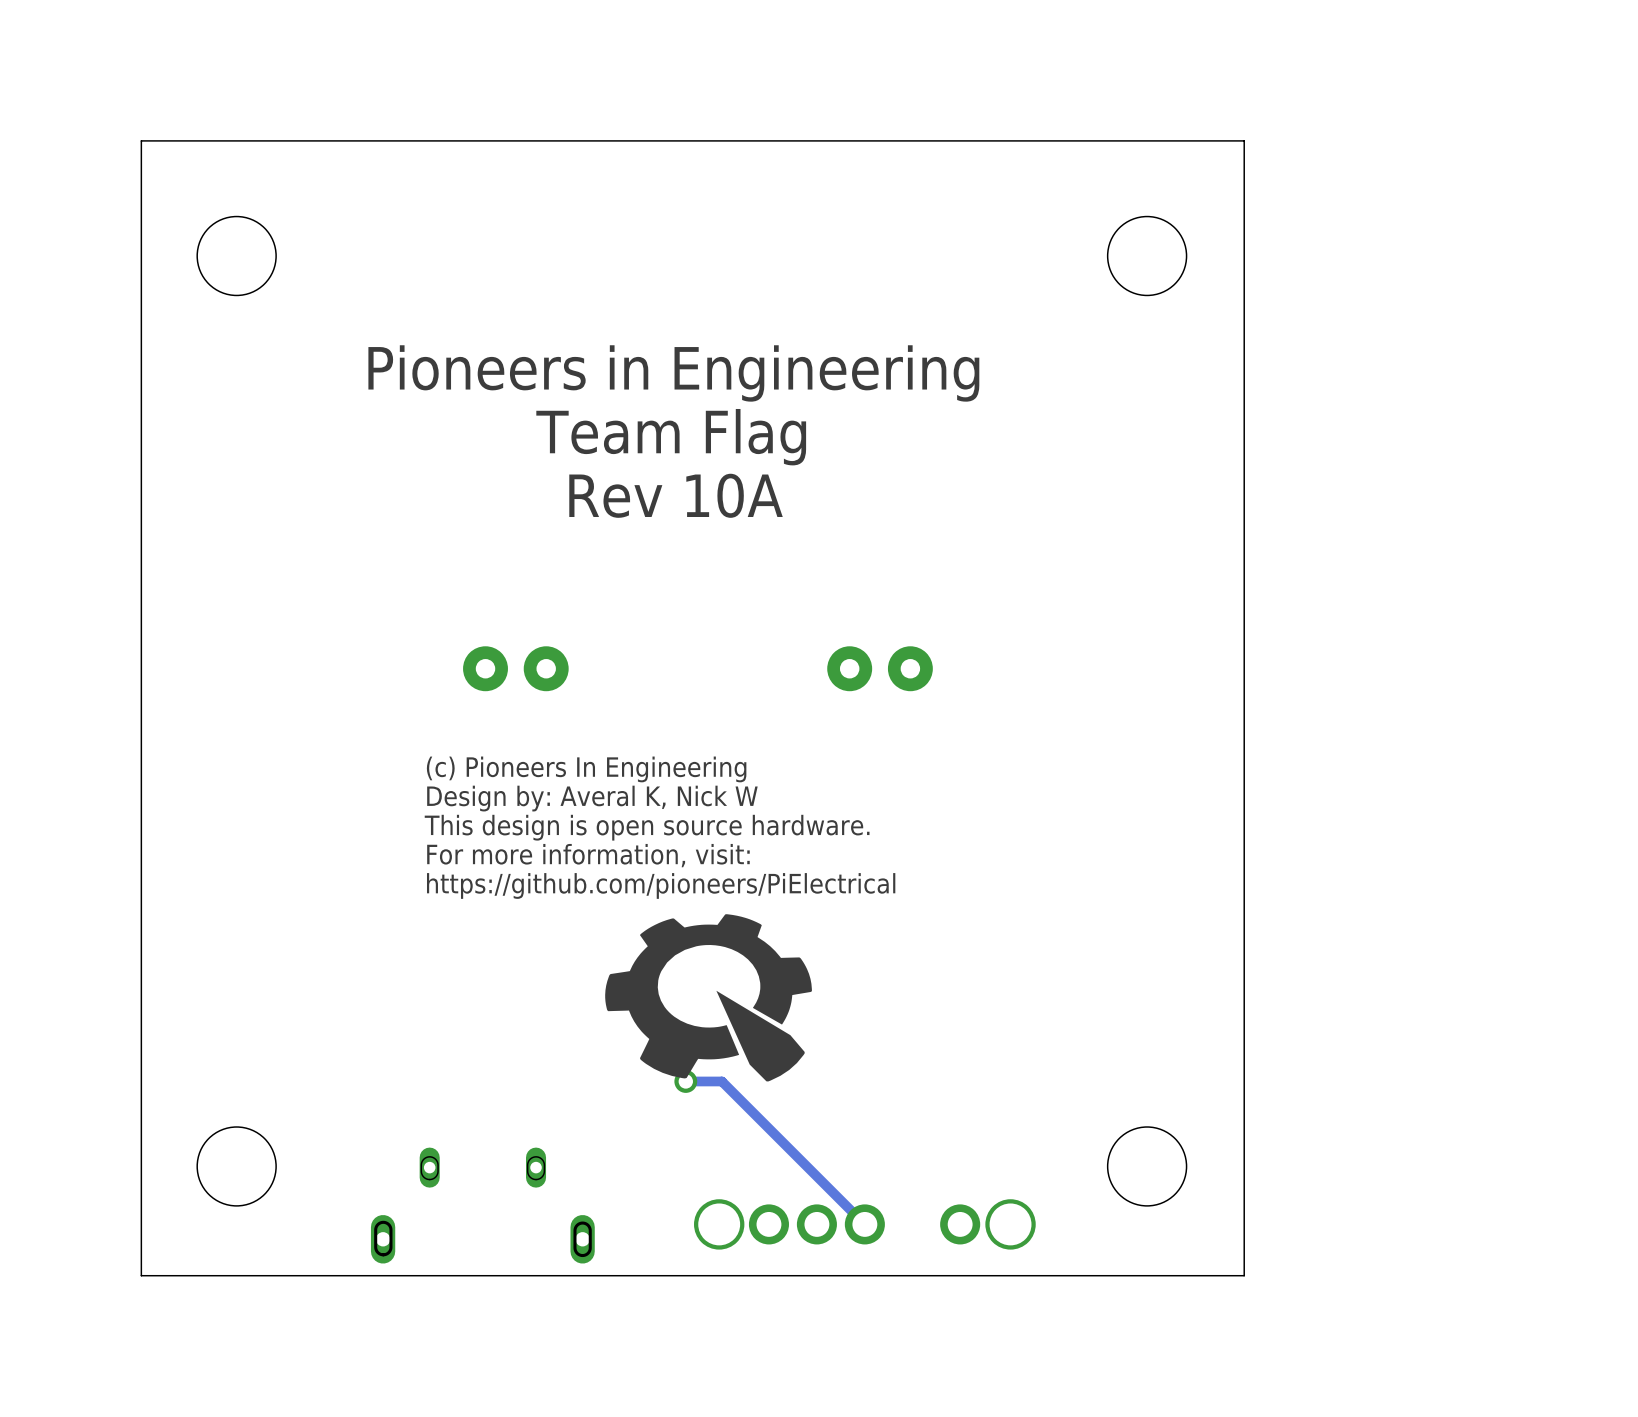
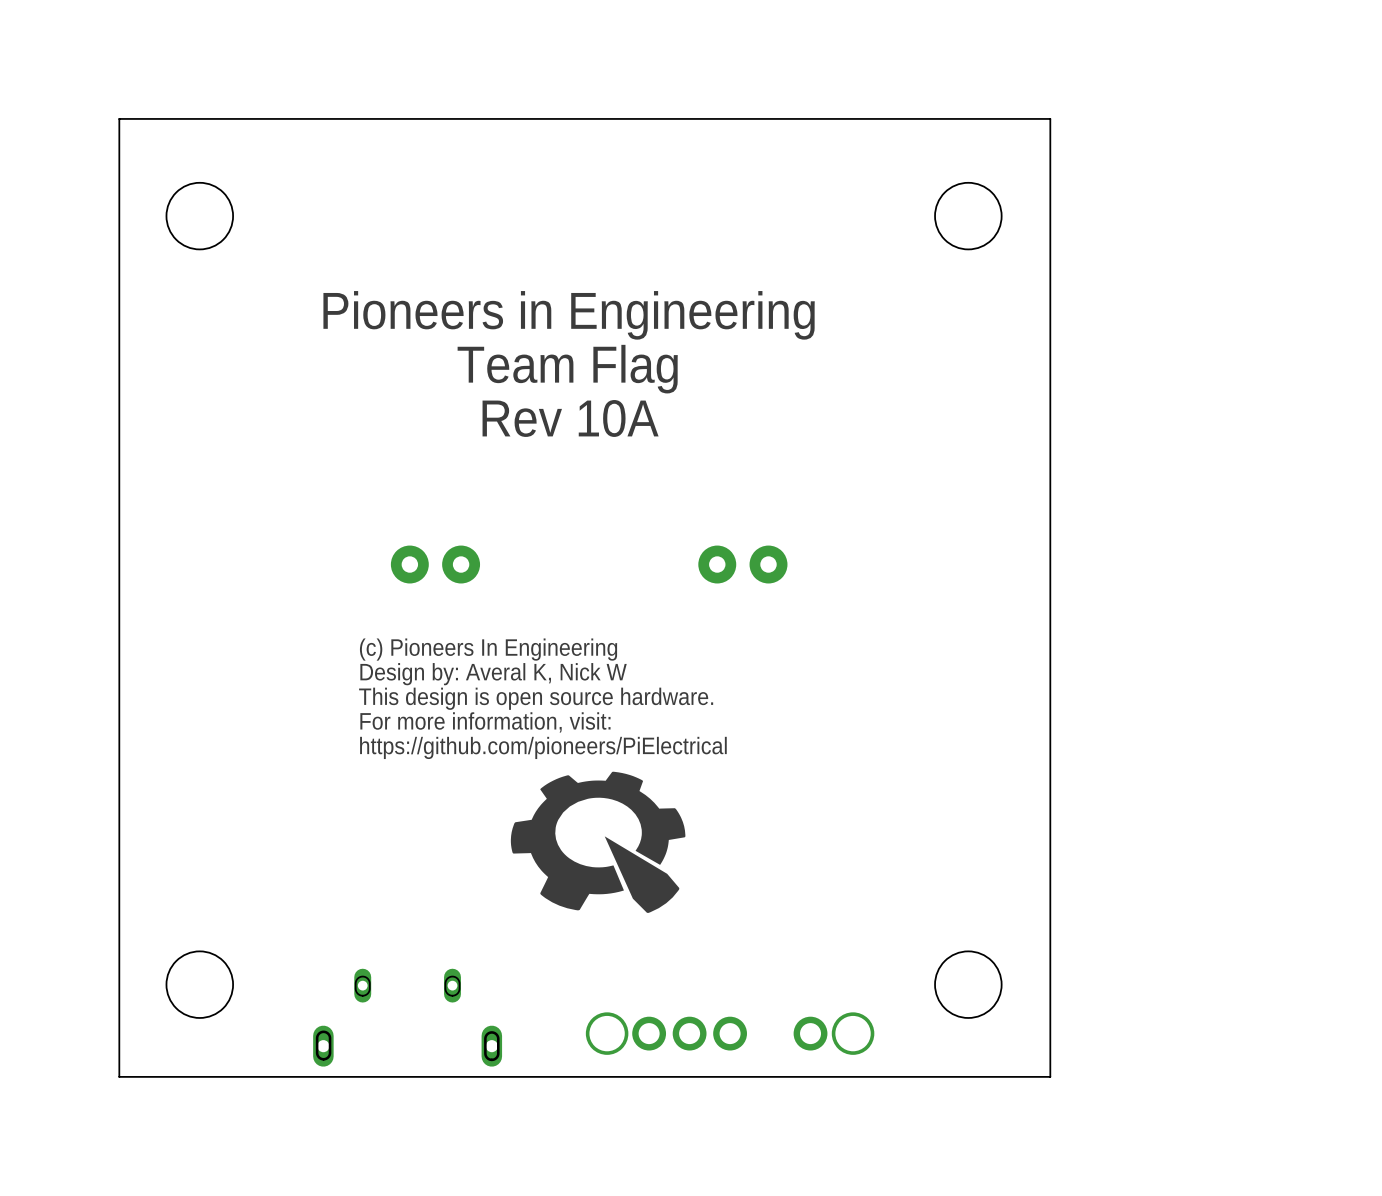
track: (685, 1081) (721, 1081) (864, 1224) -> none
via: (685, 1081) -> none

